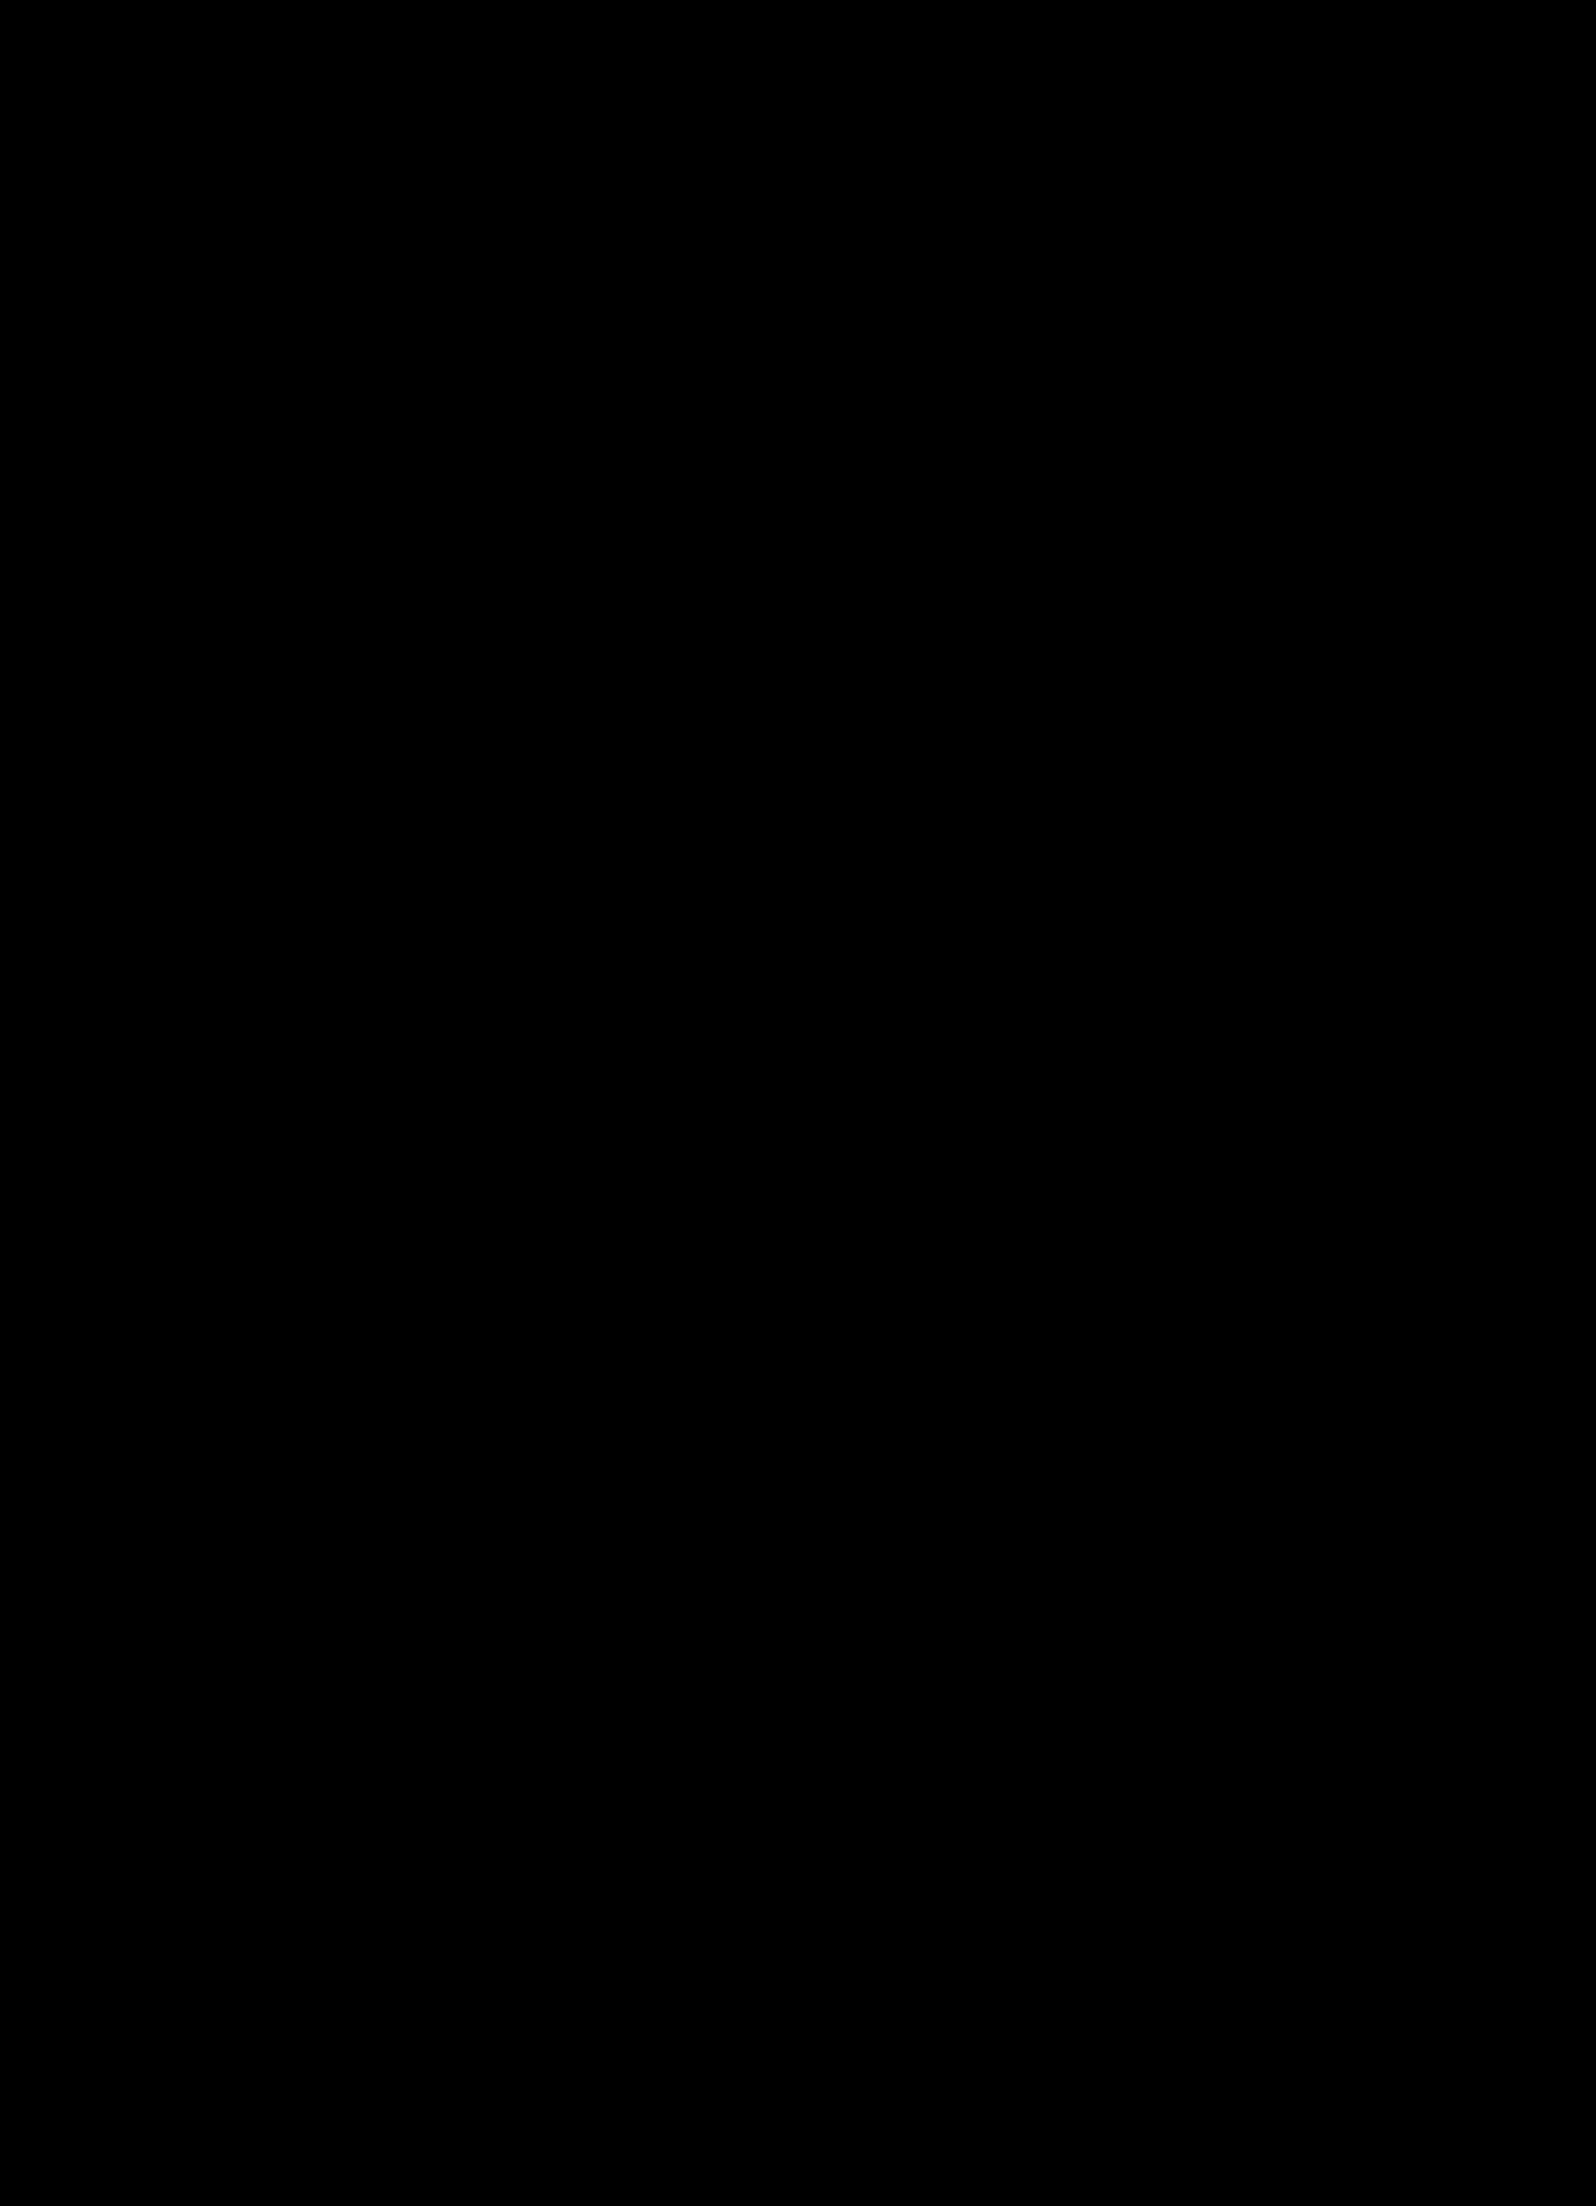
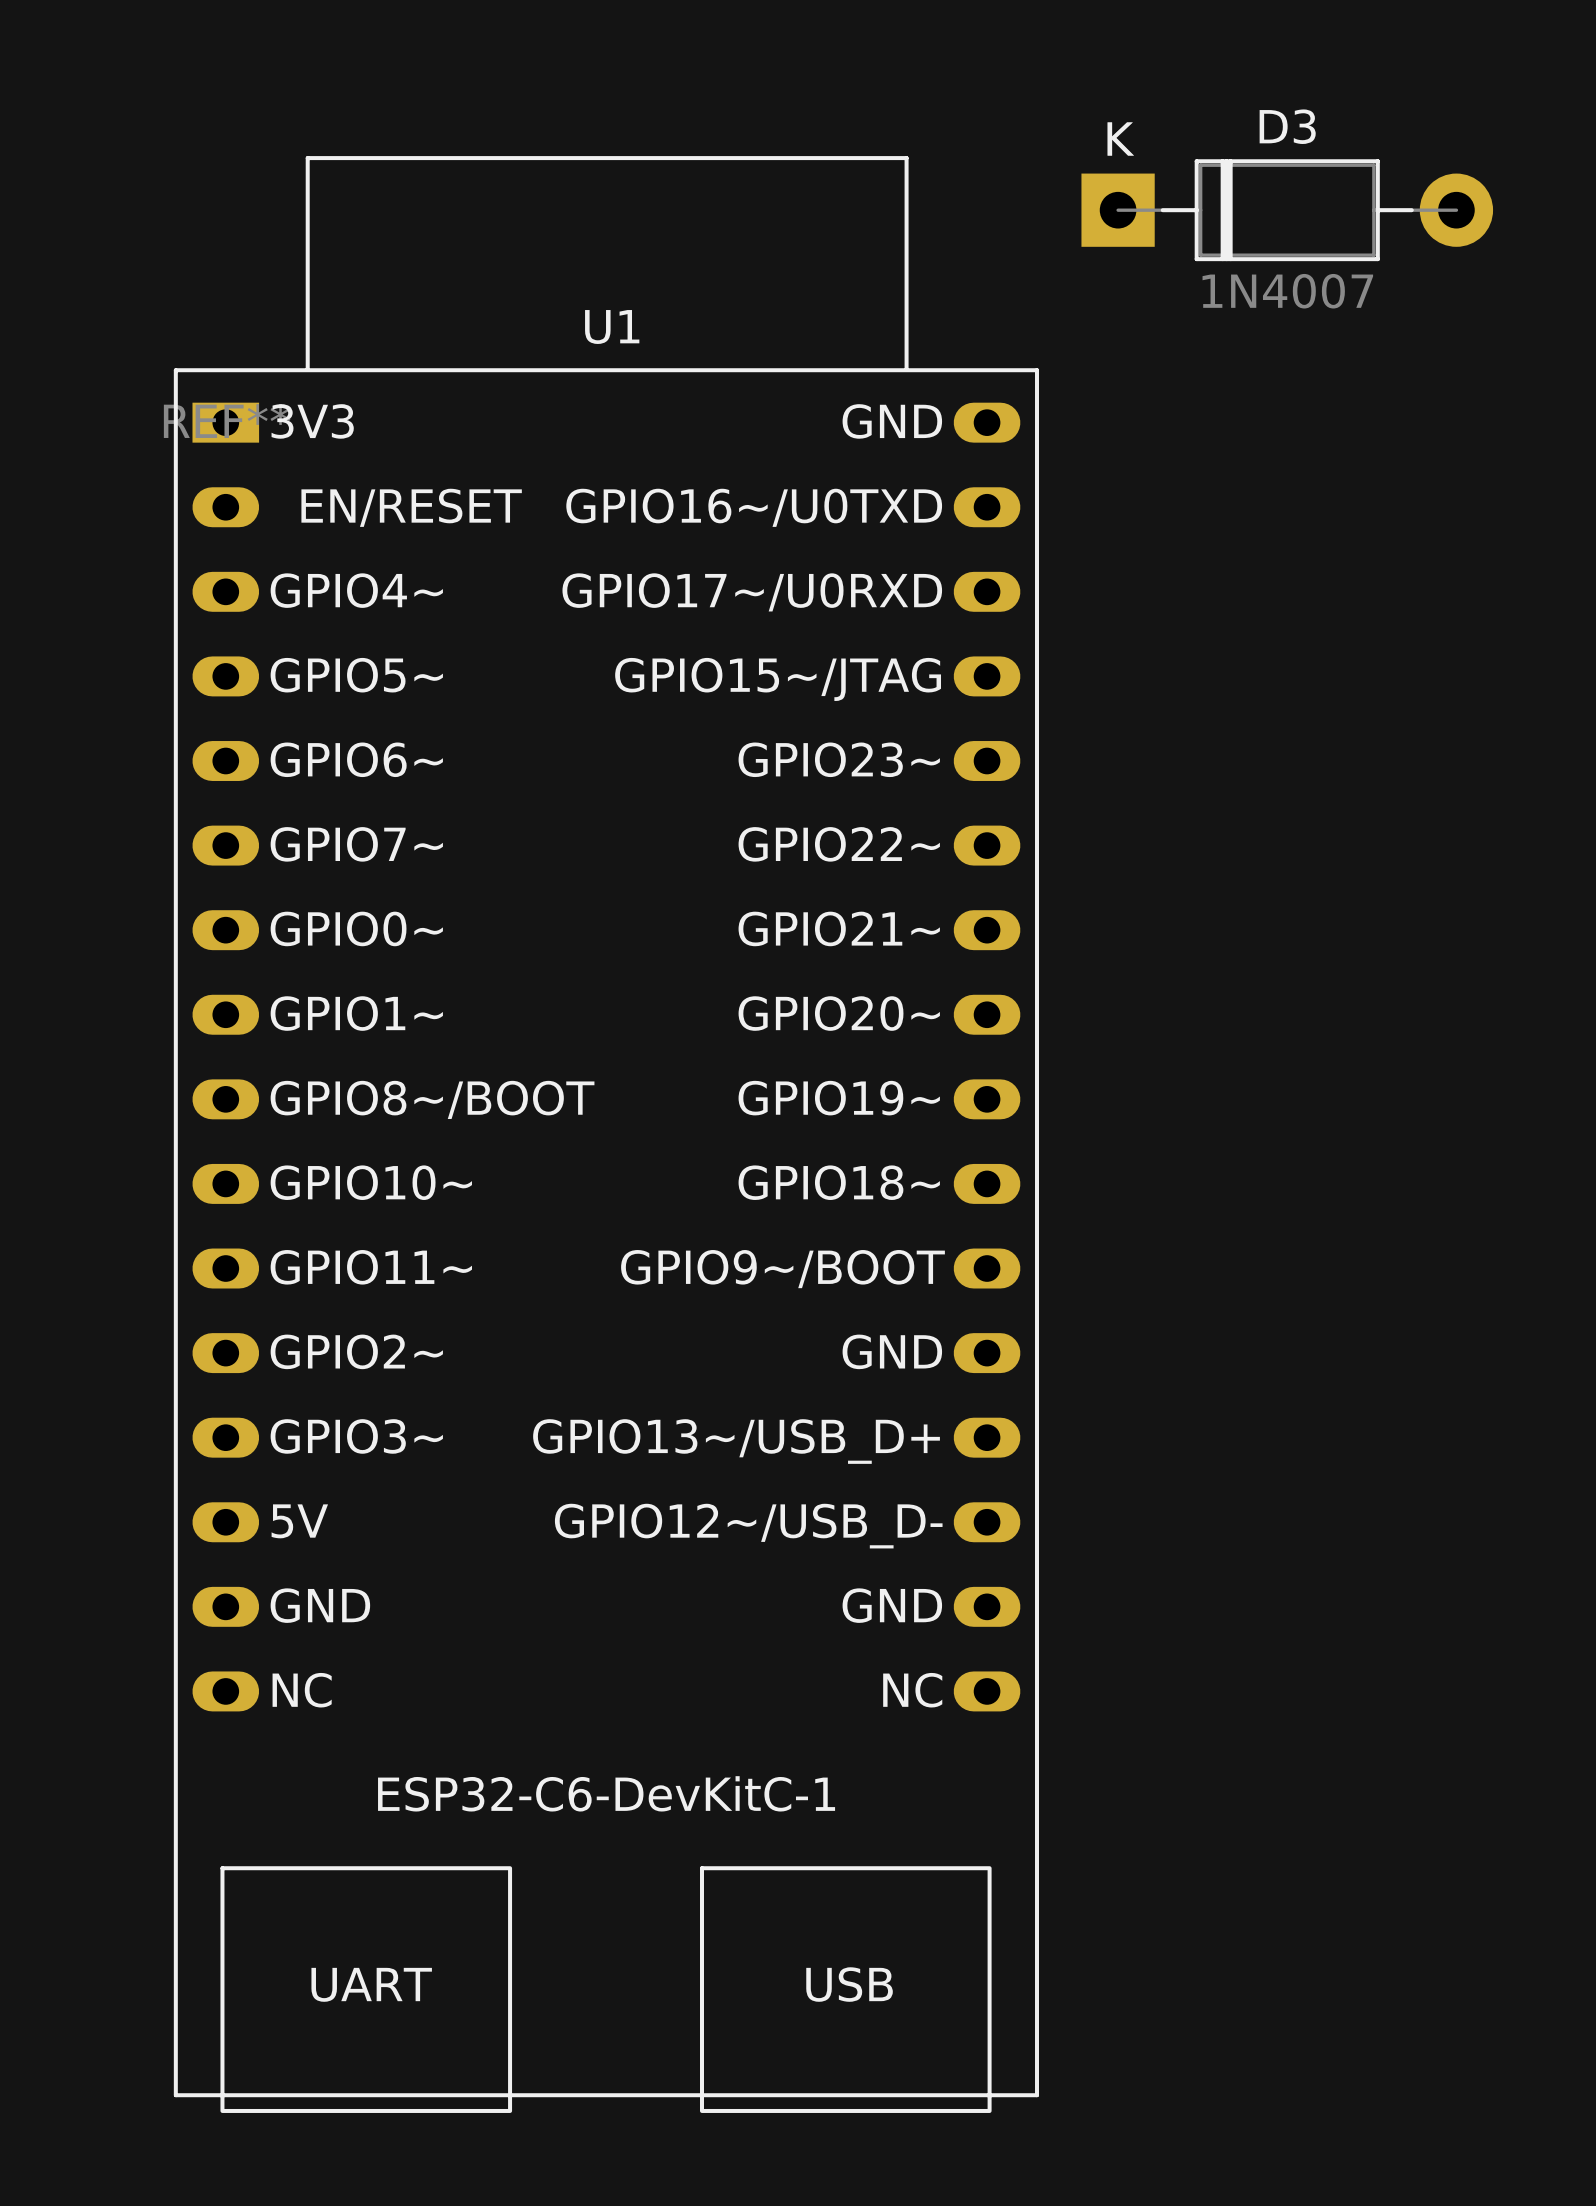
D3: none -> 1N4007 (1287, 210)
U1: none -> ESP32-C6-DevKitC-1 (606, 1134)

